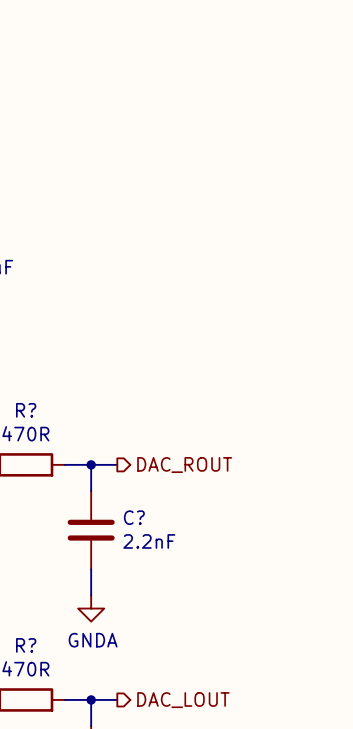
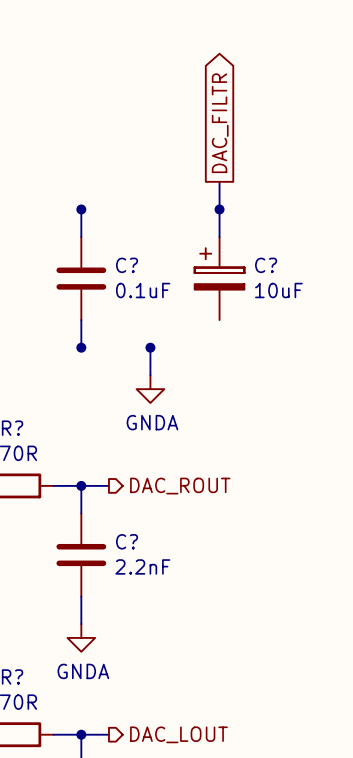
global label: none -> DAC_FILTR (220, 123)
wire: none -> (219, 181) (219, 237)
wire: none -> (81, 209) (81, 237)
junction: none -> (81, 209)
junction: none -> (219, 209)
C?: none -> 0.1uF (81, 278)
C?: none -> 10uF (219, 278)
wire: none -> (81, 320) (81, 347)
junction: none -> (81, 347)
wire: none -> (150, 347) (150, 375)
junction: none -> (150, 347)
power symbol: none -> GNDA (150, 389)

